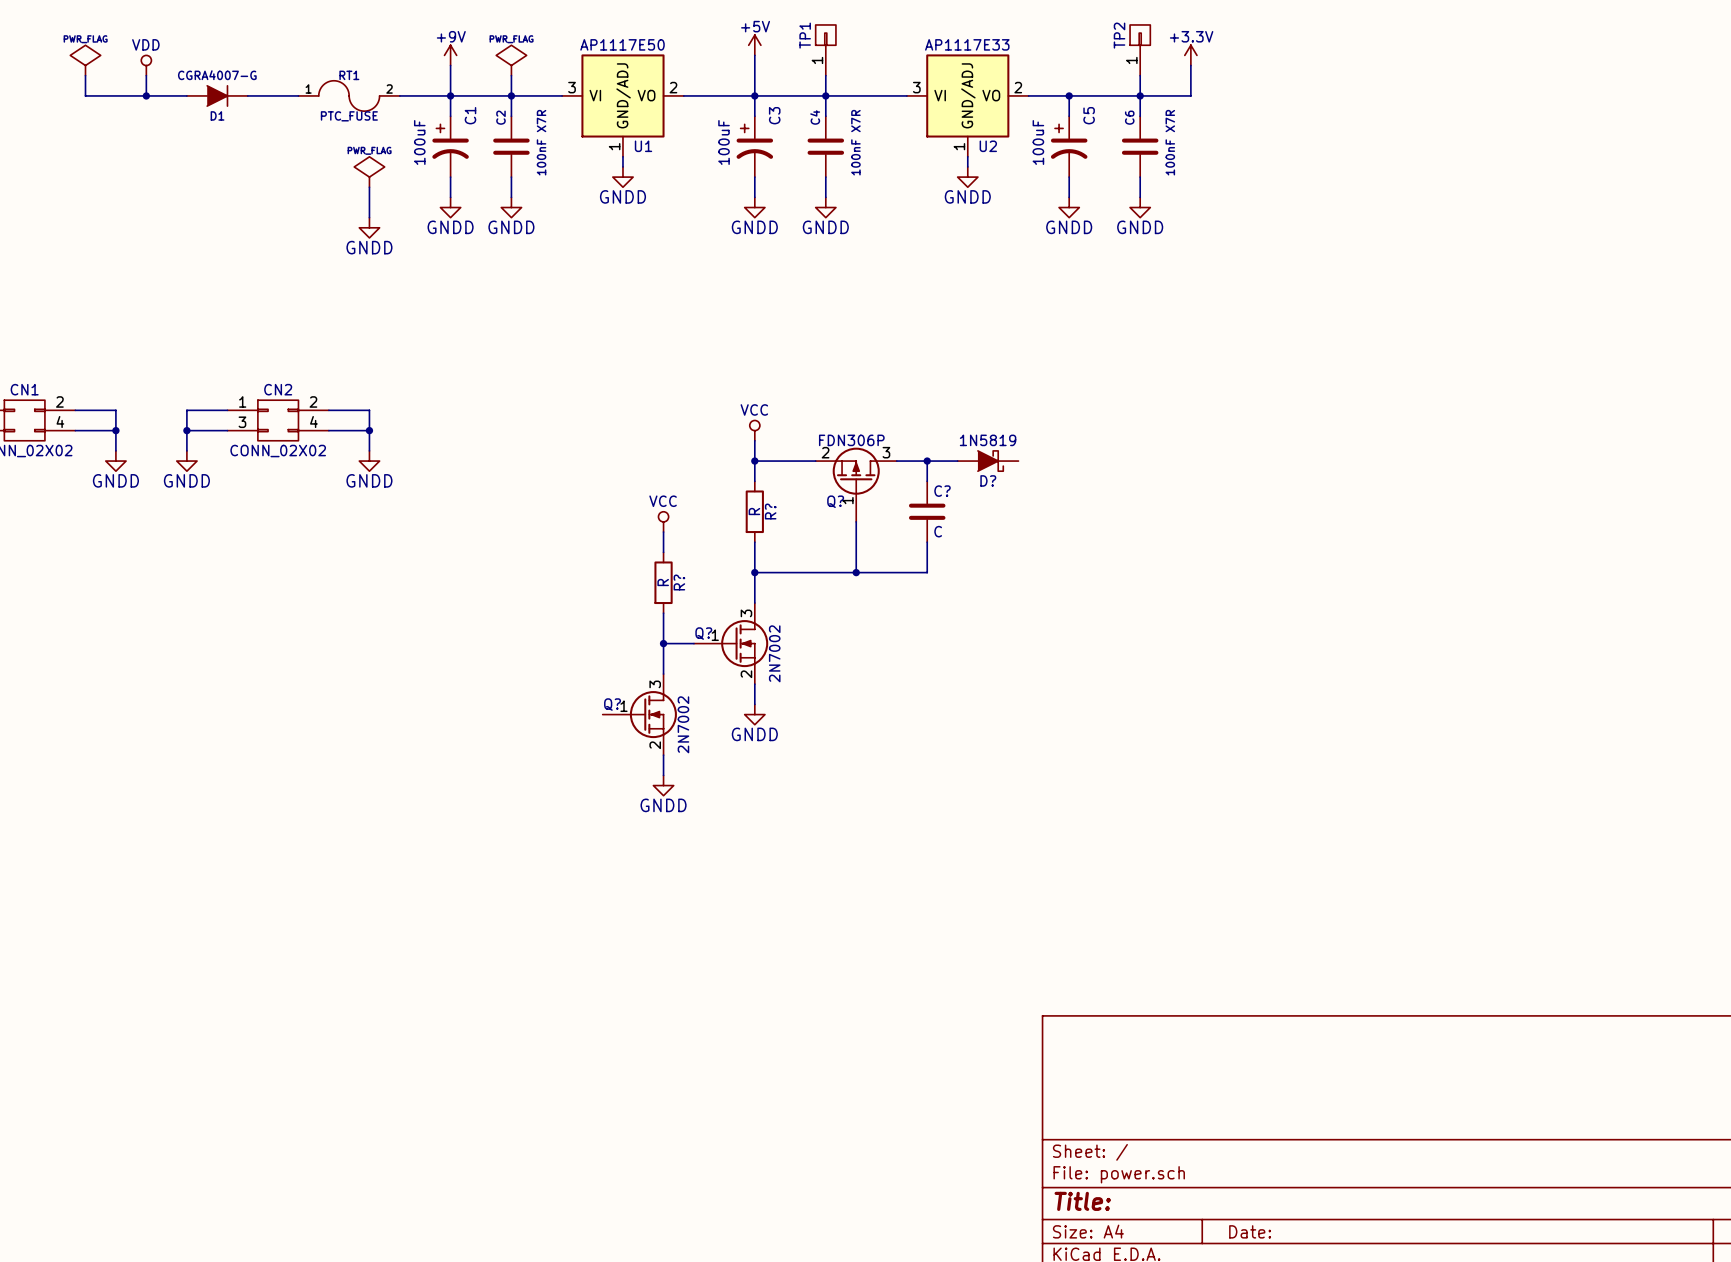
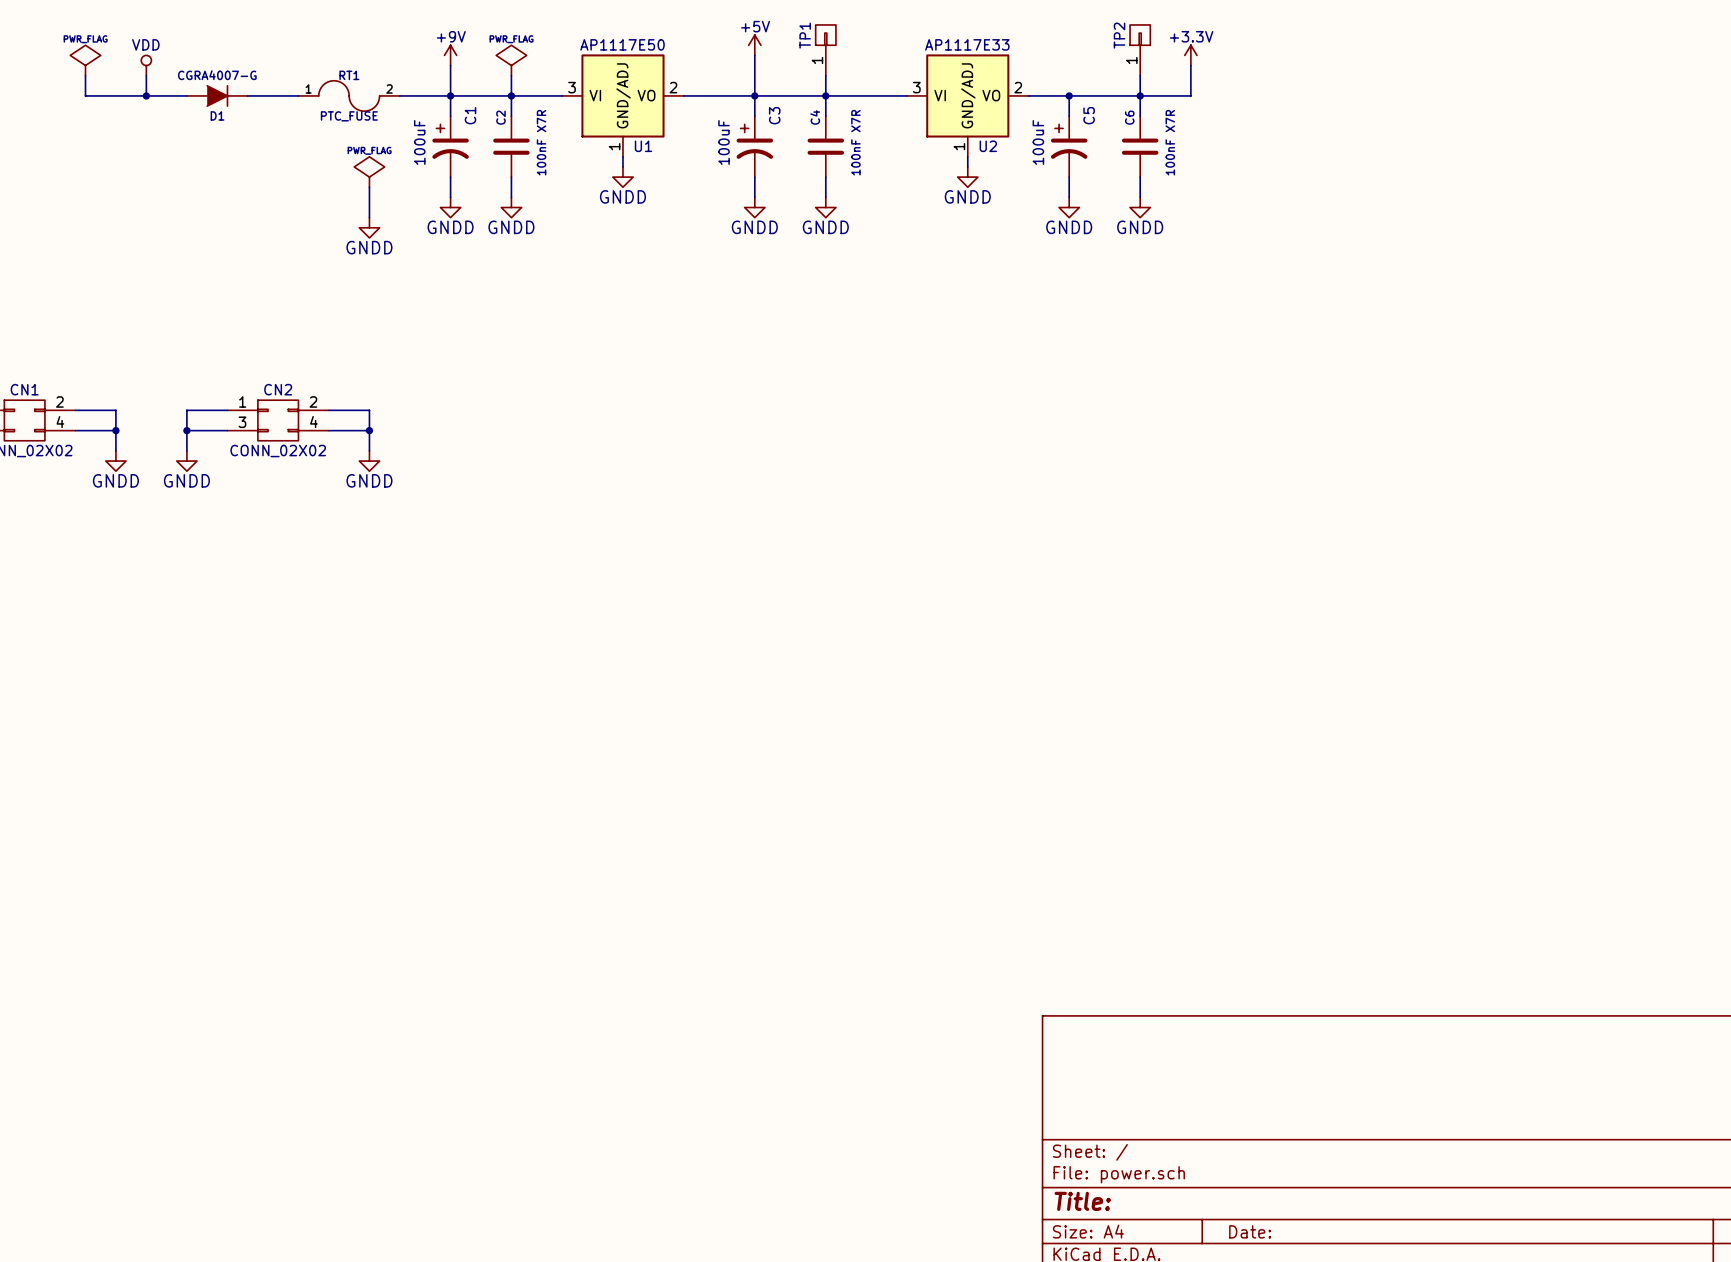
power symbol: VCC (754, 430) -> none
wire: (754, 440) (754, 481) -> none
wire: (754, 461) (815, 461) -> none
junction: (754, 461) -> none
wire: (896, 461) (957, 461) -> none
wire: (927, 461) (927, 481) -> none
junction: (927, 461) -> none
D?: 1N5819 (988, 461) -> none
Q?: FDN306P (856, 484) -> none
R?: R (754, 511) -> none
C?: C (927, 511) -> none
power symbol: VCC (663, 521) -> none
wire: (856, 521) (856, 572) -> none
wire: (663, 532) (663, 552) -> none
wire: (754, 542) (754, 603) -> none
wire: (927, 542) (927, 572) (754, 572) -> none
junction: (754, 572) -> none
junction: (856, 572) -> none
R?: R (663, 582) -> none
wire: (663, 613) (663, 674) -> none
wire: (663, 643) (693, 643) -> none
junction: (663, 643) -> none
Q?: 2N7002 (731, 643) -> none
wire: (754, 684) (754, 704) -> none
Q?: 2N7002 (639, 714) -> none
power symbol: GNDD (754, 714) -> none
wire: (663, 755) (663, 775) -> none
power symbol: GNDD (663, 785) -> none

